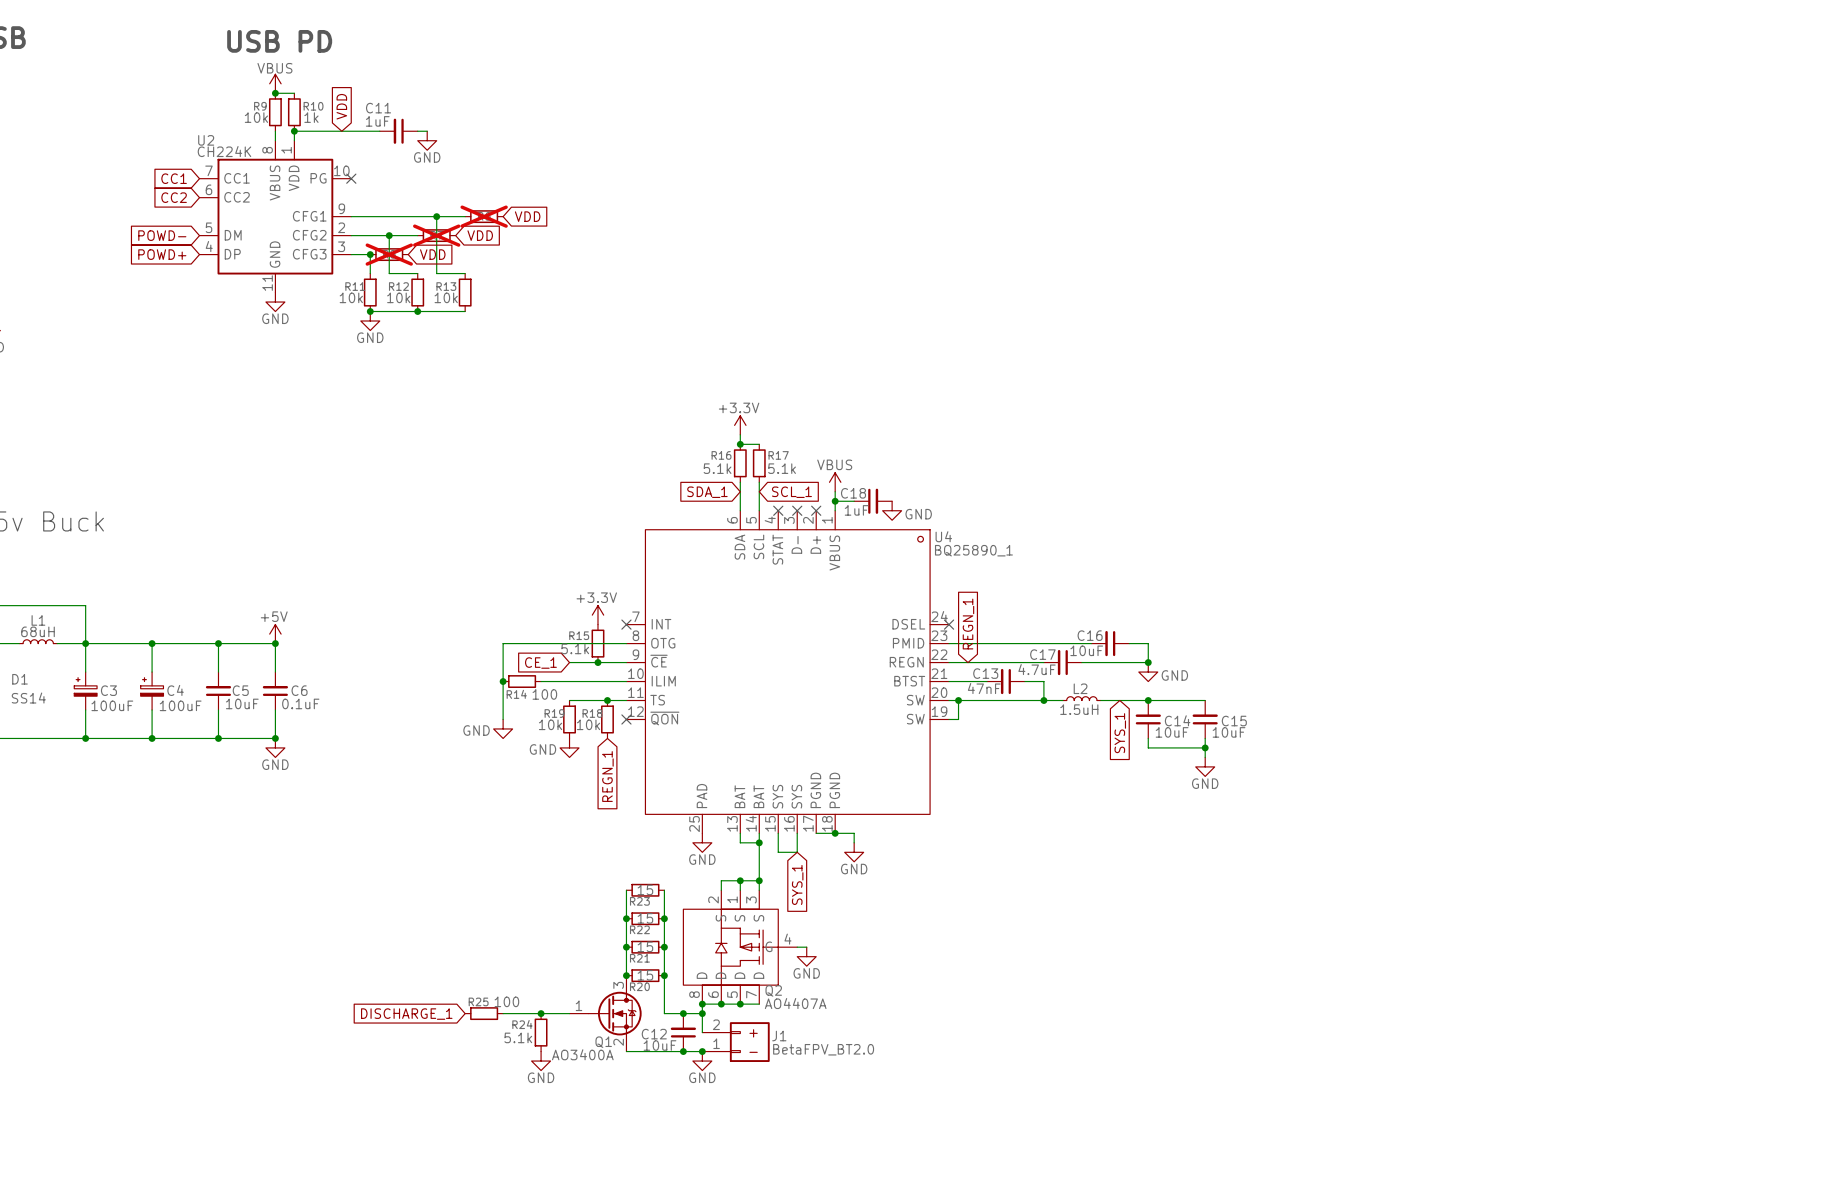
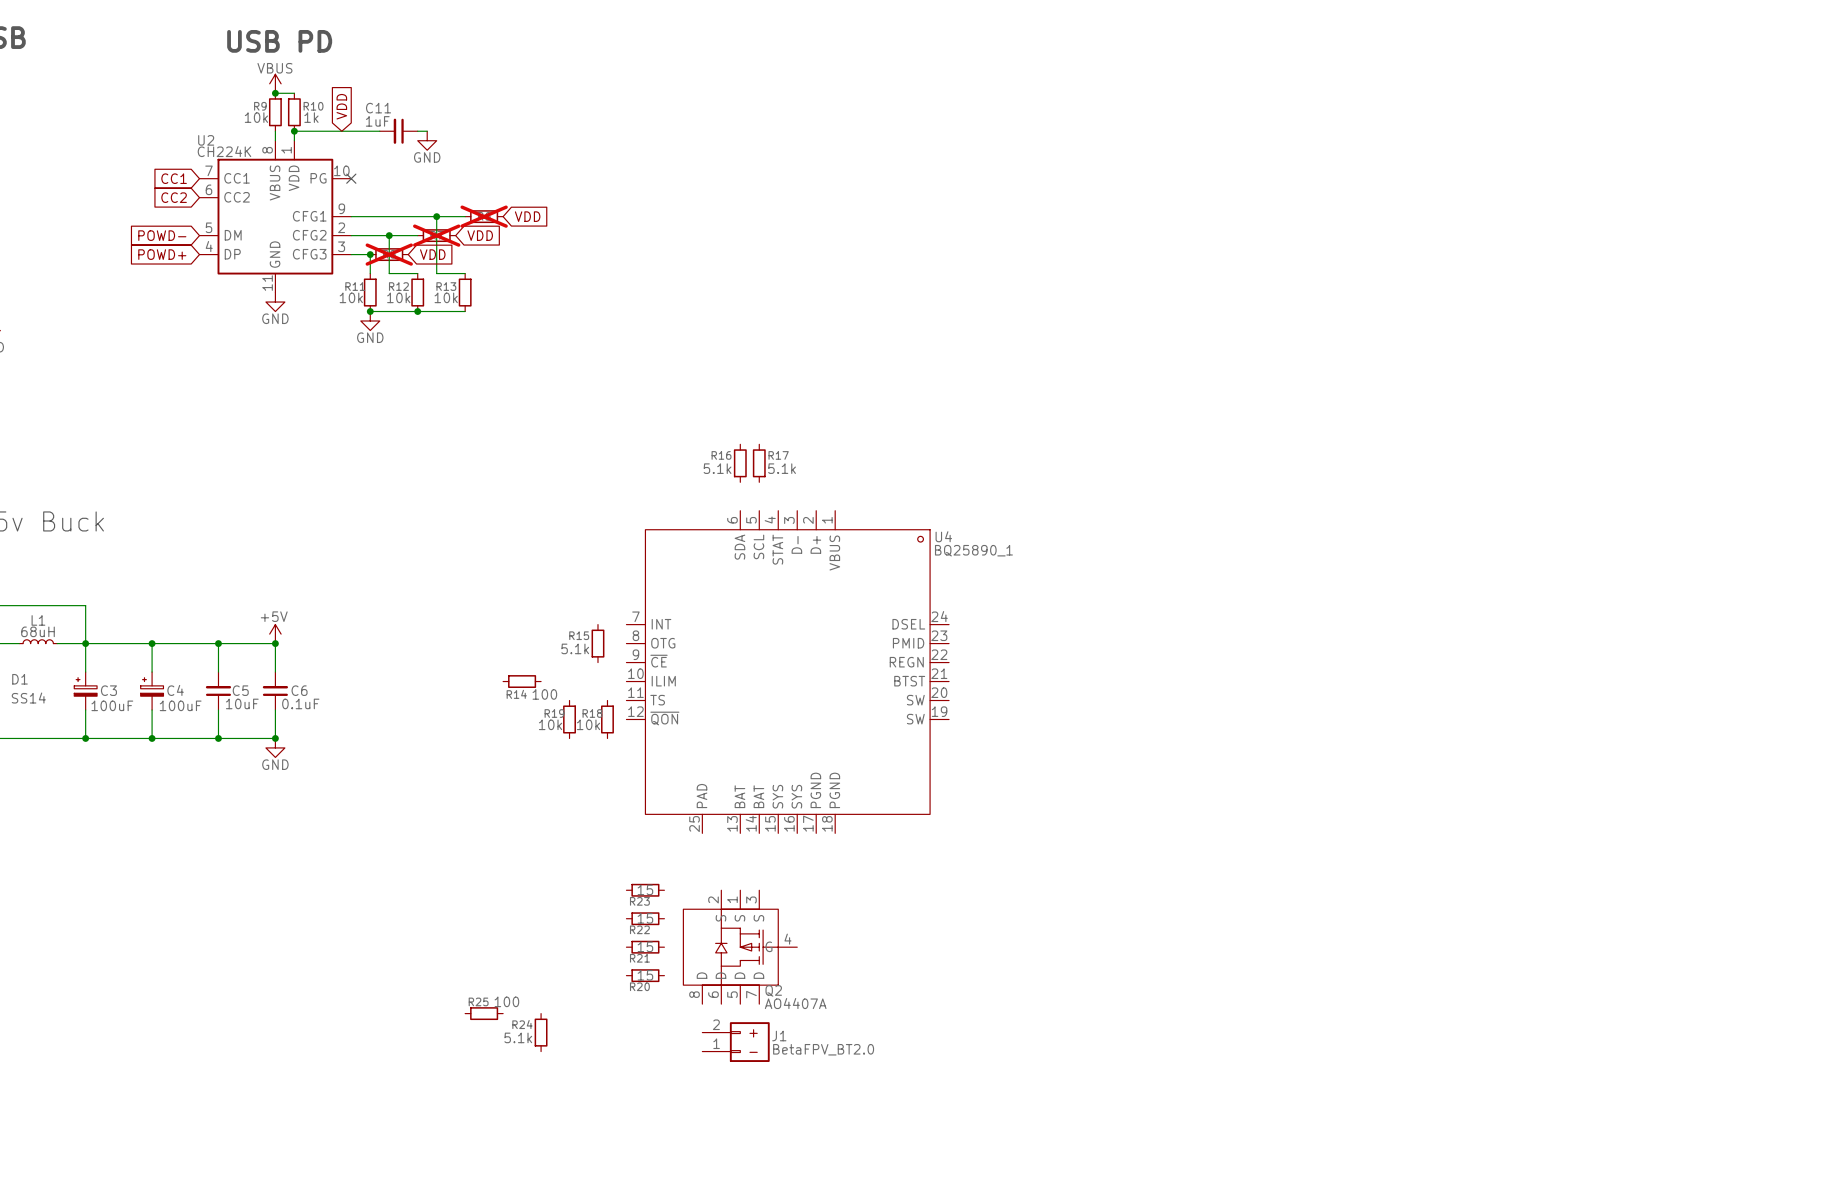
power symbol: +3.3V (740, 425) -> none
wire: (740, 434) (740, 444) (759, 444) -> none
junction: (740, 444) -> none
wire: (740, 482) (740, 510) -> none
wire: (759, 482) (759, 510) -> none
power symbol: VBUS (835, 482) -> none
wire: (835, 491) (835, 510) -> none
global label: SDA_1 (707, 492) -> none
global label: SCL_1 (791, 492) -> none
wire: (835, 501) (854, 501) -> none
junction: (835, 501) -> none
C18: 1uF (873, 501) -> none
no-connect mark: (778, 510) -> none
no-connect mark: (797, 510) -> none
no-connect mark: (816, 510) -> none
power symbol: GND (892, 510) -> none
power symbol: +3.3V (597, 615) -> none
no-connect mark: (626, 624) -> none
no-connect mark: (949, 624) -> none
global label: REGN_1 (968, 624) -> none
wire: (626, 643) (503, 643) (503, 719) -> none
wire: (949, 643) (1091, 643) -> none
C16: 10uF (1110, 643) -> none
wire: (1129, 643) (1148, 643) (1148, 662) (1081, 662) -> none
wire: (569, 662) (626, 662) -> none
junction: (597, 662) -> none
wire: (949, 662) (1043, 662) -> none
C17: 4.7uF (1062, 662) -> none
junction: (1148, 662) -> none
global label: CE_1 (540, 663) -> none
power symbol: GND (1148, 672) -> none
junction: (503, 681) -> none
wire: (541, 681) (626, 681) -> none
wire: (949, 681) (986, 681) -> none
C13: 47nF (1005, 681) -> none
wire: (1024, 681) (1043, 681) (1043, 700) -> none
L2: 1.5uH (1081, 698) -> none
wire: (569, 700) (626, 700) -> none
junction: (607, 700) -> none
wire: (949, 700) (1062, 700) -> none
wire: (958, 700) (958, 719) (949, 719) -> none
junction: (958, 700) -> none
junction: (1043, 700) -> none
wire: (1100, 700) (1205, 700) -> none
junction: (1148, 700) -> none
no-connect mark: (626, 719) -> none
C14: 10uF (1148, 719) -> none
C15: 10uF (1205, 719) -> none
power symbol: GND (503, 728) -> none
global label: SYS_1 (1120, 733) -> none
wire: (1148, 738) (1148, 747) (1205, 747) -> none
wire: (1205, 738) (1205, 757) -> none
power symbol: GND (569, 747) -> none
junction: (1205, 747) -> none
power symbol: GND (1205, 766) -> none
global label: REGN_1 (607, 776) -> none
wire: (740, 833) (740, 842) (759, 842) -> none
wire: (759, 833) (759, 890) -> none
wire: (778, 833) (778, 852) (797, 852) (797, 833) -> none
wire: (816, 833) (854, 833) (854, 842) -> none
junction: (835, 833) -> none
power symbol: GND (702, 842) -> none
junction: (759, 842) -> none
power symbol: GND (854, 852) -> none
wire: (740, 880) (740, 890) -> none
junction: (740, 880) -> none
wire: (759, 880) (721, 880) (721, 890) -> none
junction: (759, 880) -> none
global label: SYS_1 (797, 884) -> none
wire: (626, 890) (626, 975) -> none
wire: (664, 890) (664, 1013) (702, 1013) -> none
junction: (626, 918) -> none
junction: (664, 918) -> none
junction: (626, 947) -> none
junction: (664, 947) -> none
wire: (797, 947) (806, 947) -> none
power symbol: GND (806, 956) -> none
junction: (626, 975) -> none
junction: (664, 975) -> none
junction: (702, 1004) -> none
junction: (721, 1004) -> none
junction: (740, 1004) -> none
wire: (759, 1004) (702, 1004) (702, 1032) -> none
wire: (503, 1013) (569, 1013) -> none
junction: (541, 1013) -> none
Q1: AO3400A (605, 1013) -> none
junction: (683, 1013) -> none
junction: (702, 1013) -> none
global label: DISCHARGE_1 (406, 1014) -> none
C12: 10uF (683, 1032) -> none
wire: (626, 1051) (702, 1051) -> none
junction: (683, 1051) -> none
junction: (702, 1051) -> none
power symbol: GND (541, 1061) -> none
power symbol: GND (702, 1061) -> none

